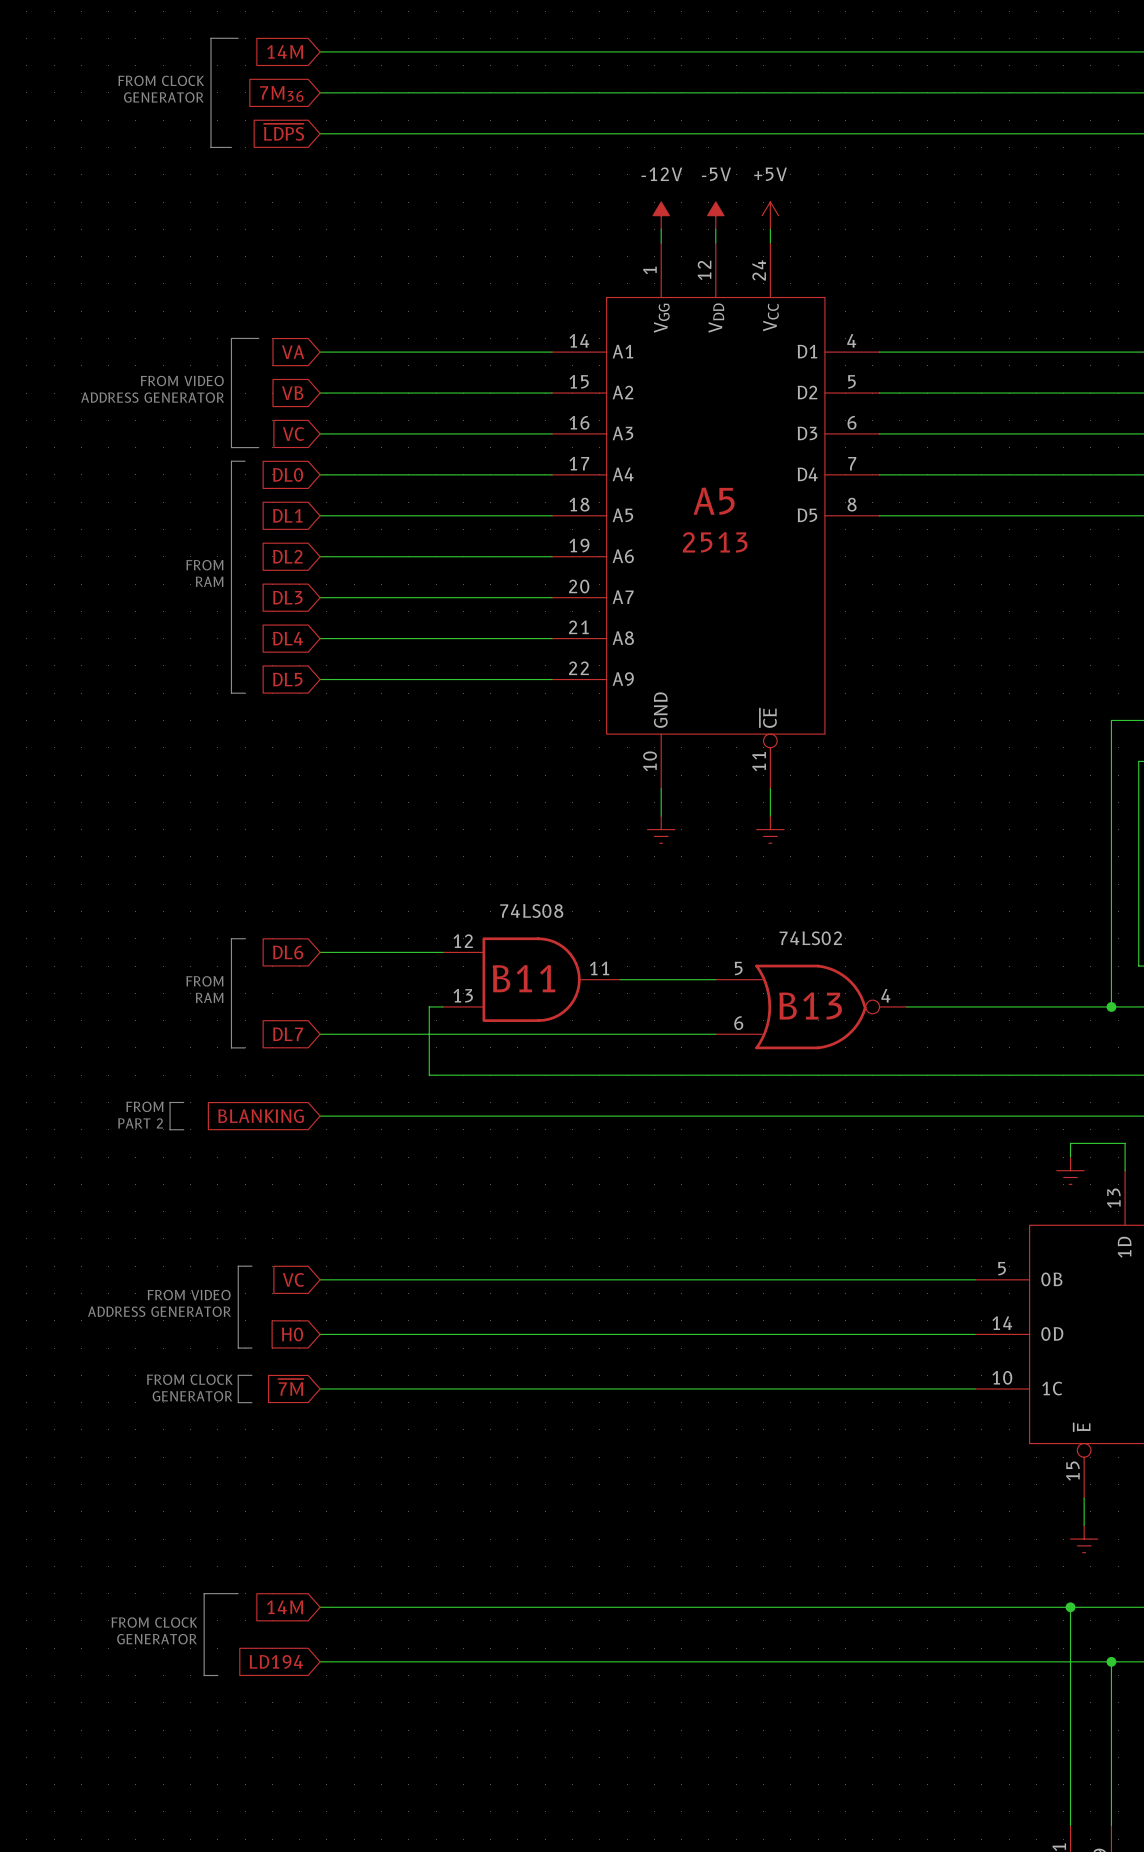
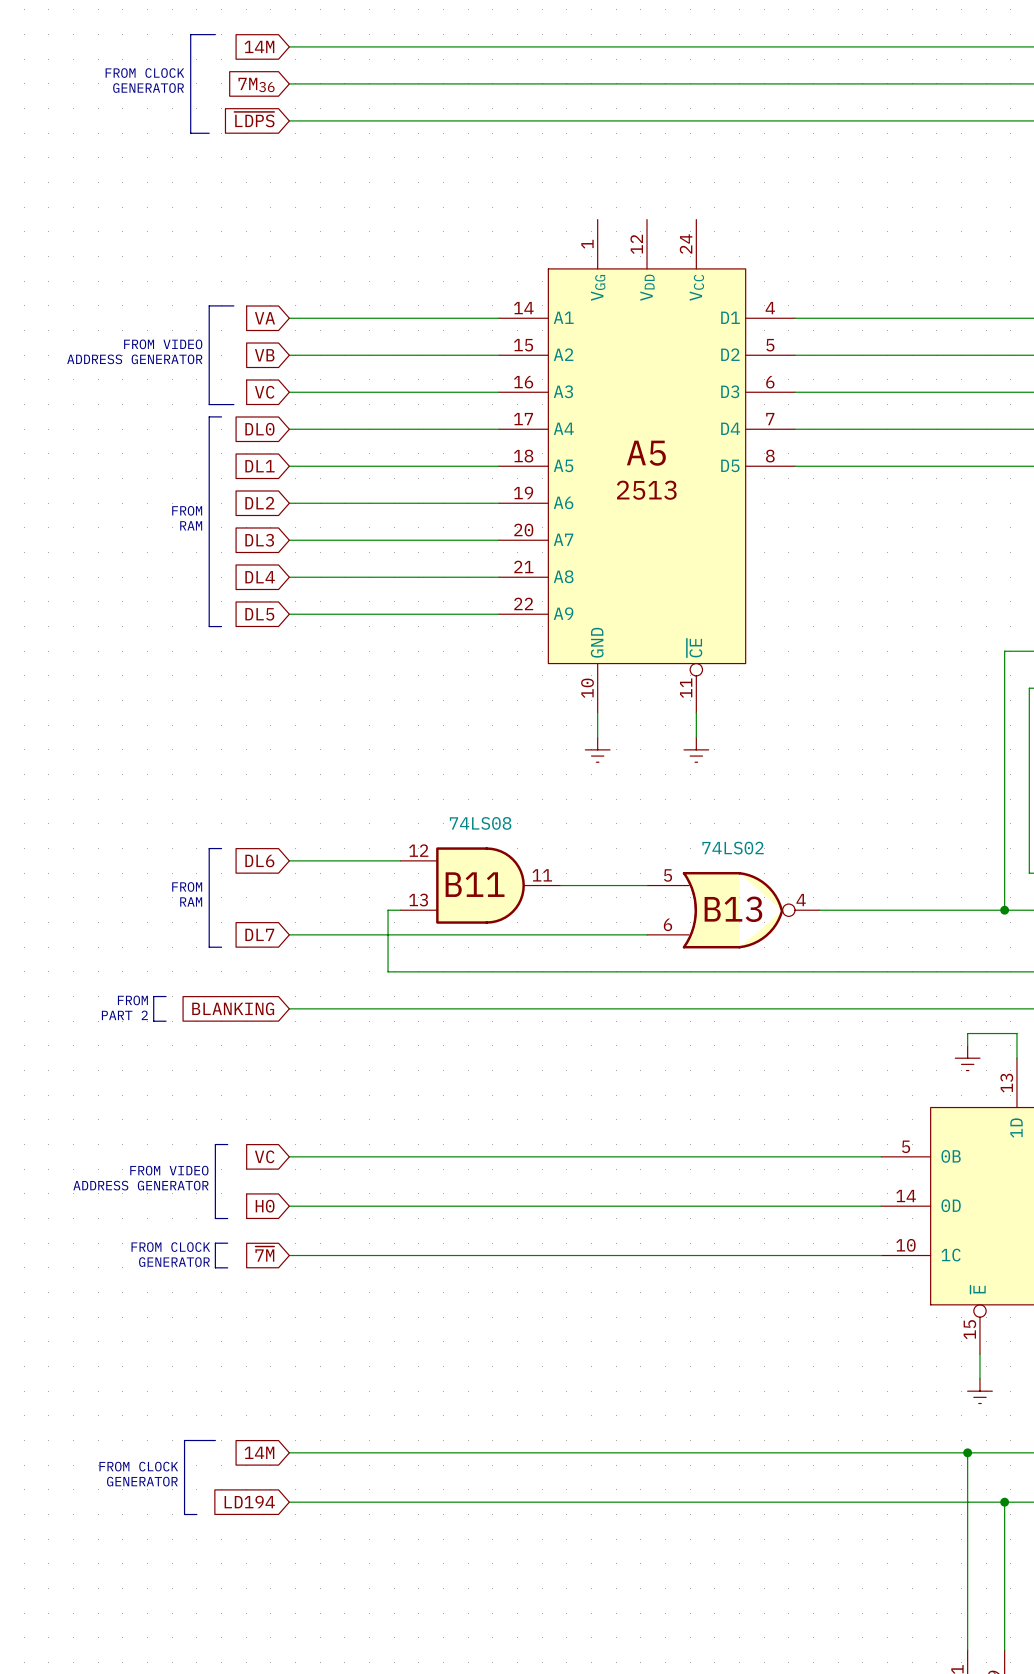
power symbol: -12V (661, 215) -> none
power symbol: -5V (715, 215) -> none
power symbol: +5V (770, 215) -> none
wire: (661, 229) (661, 242) -> none
wire: (715, 229) (715, 242) -> none
wire: (770, 229) (770, 242) -> none

